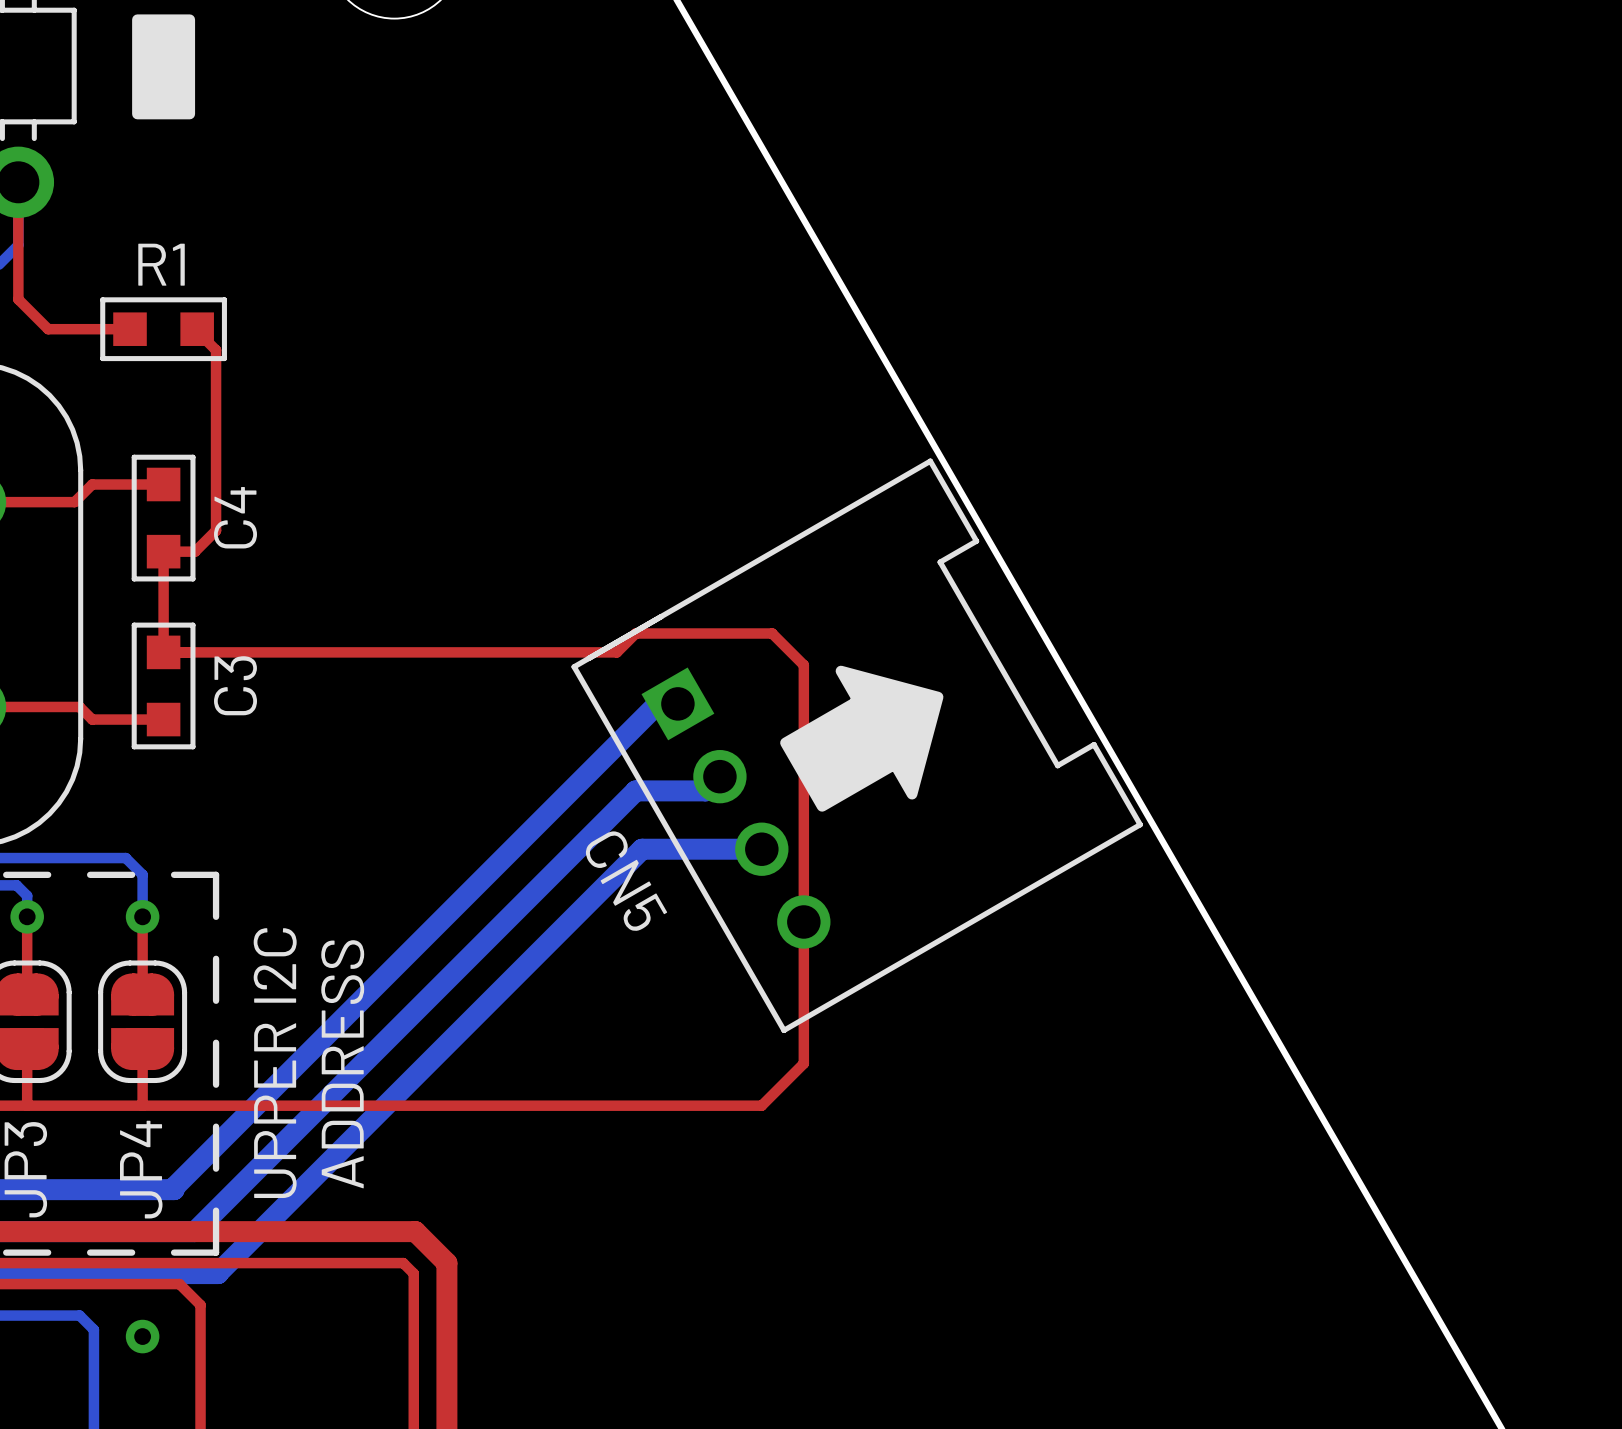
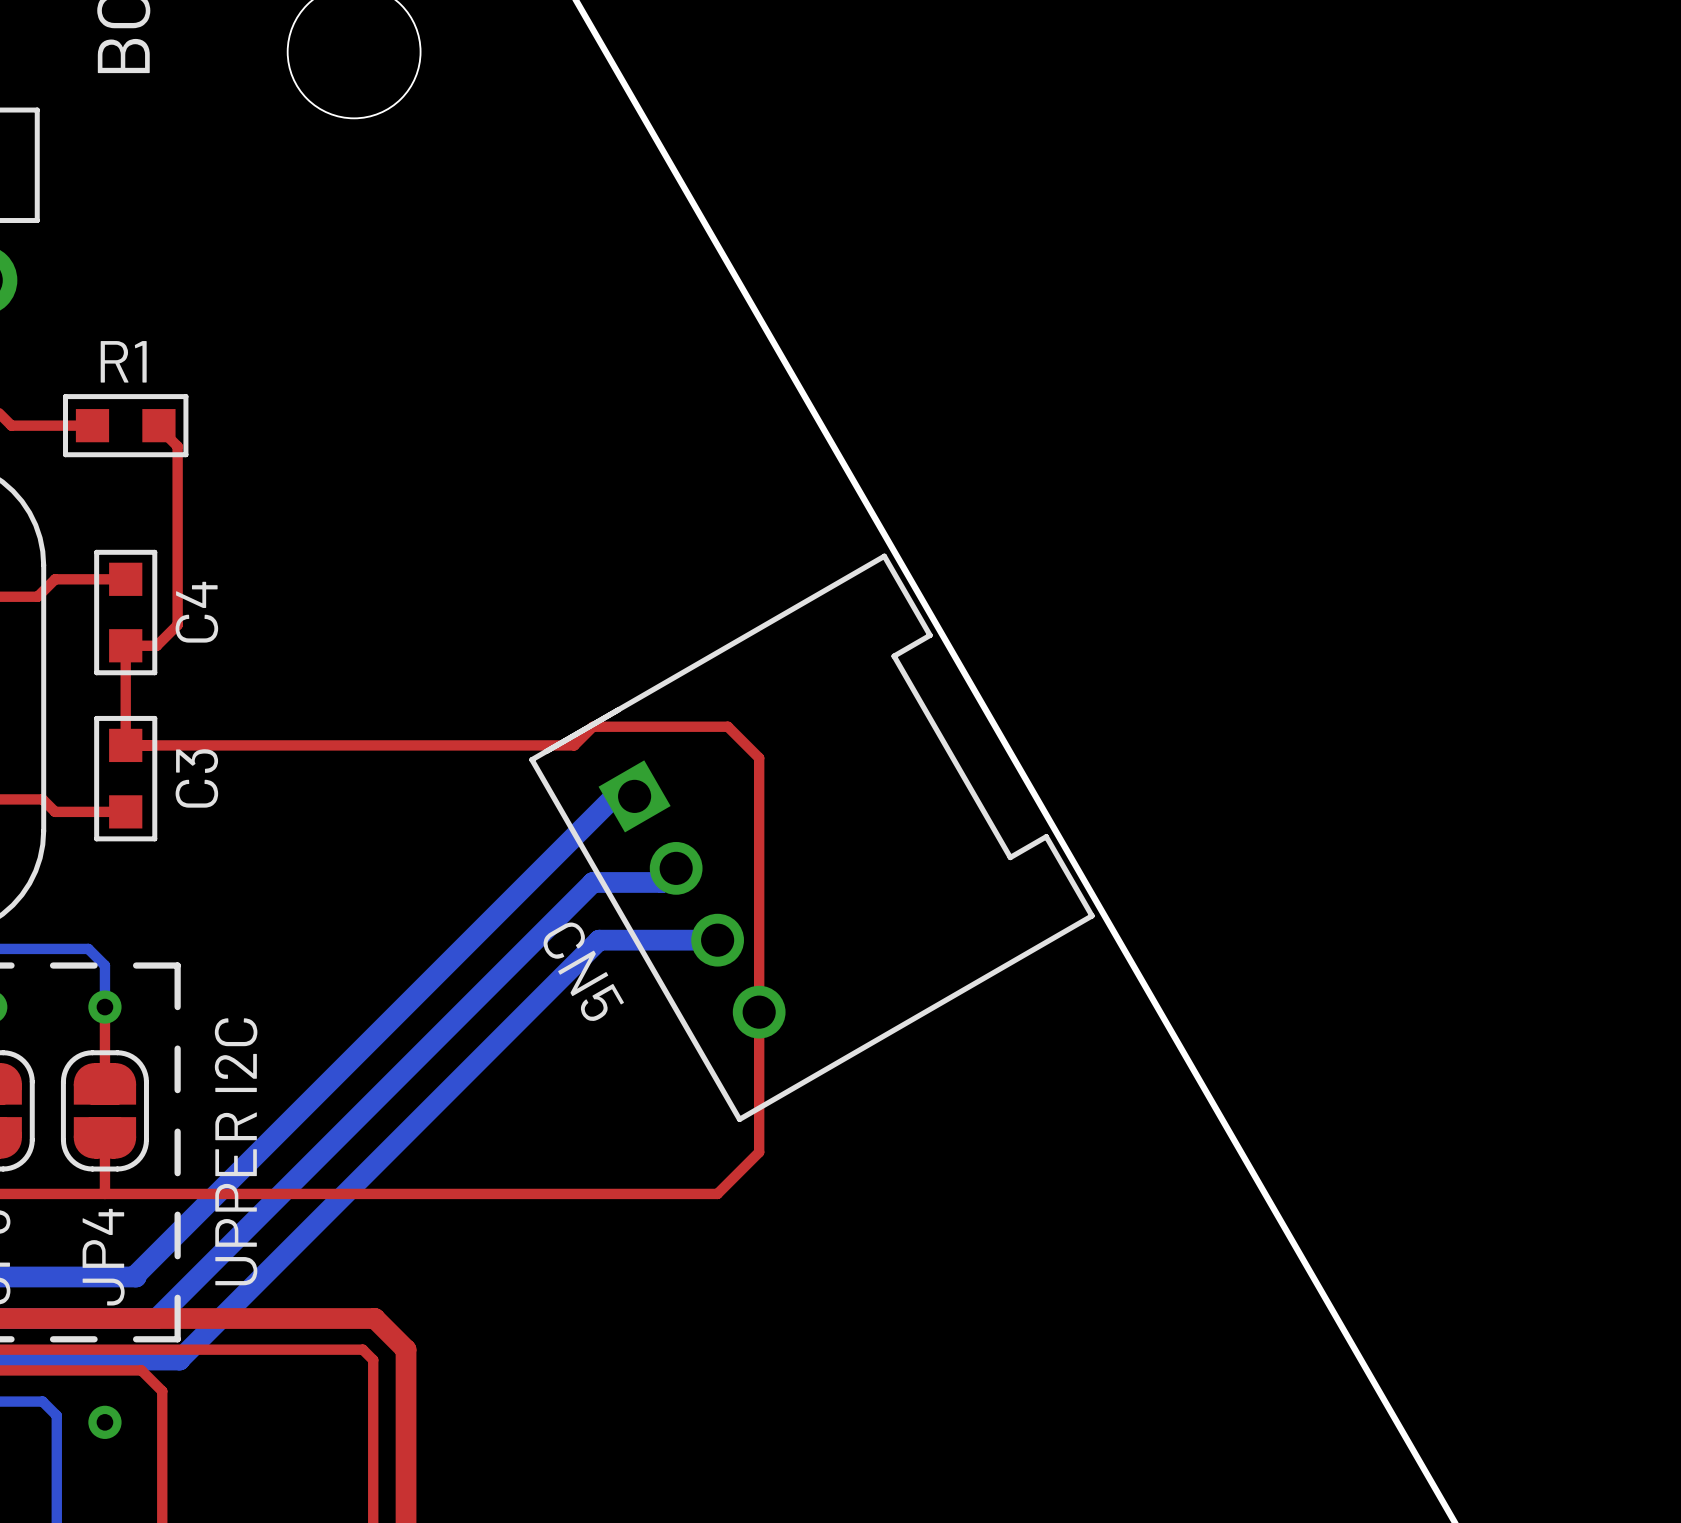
drawing: [132, 14, 196, 120] -> none
drawing: [780, 665, 944, 812] -> none
text: ADDRESS (342, 1064) -> none

